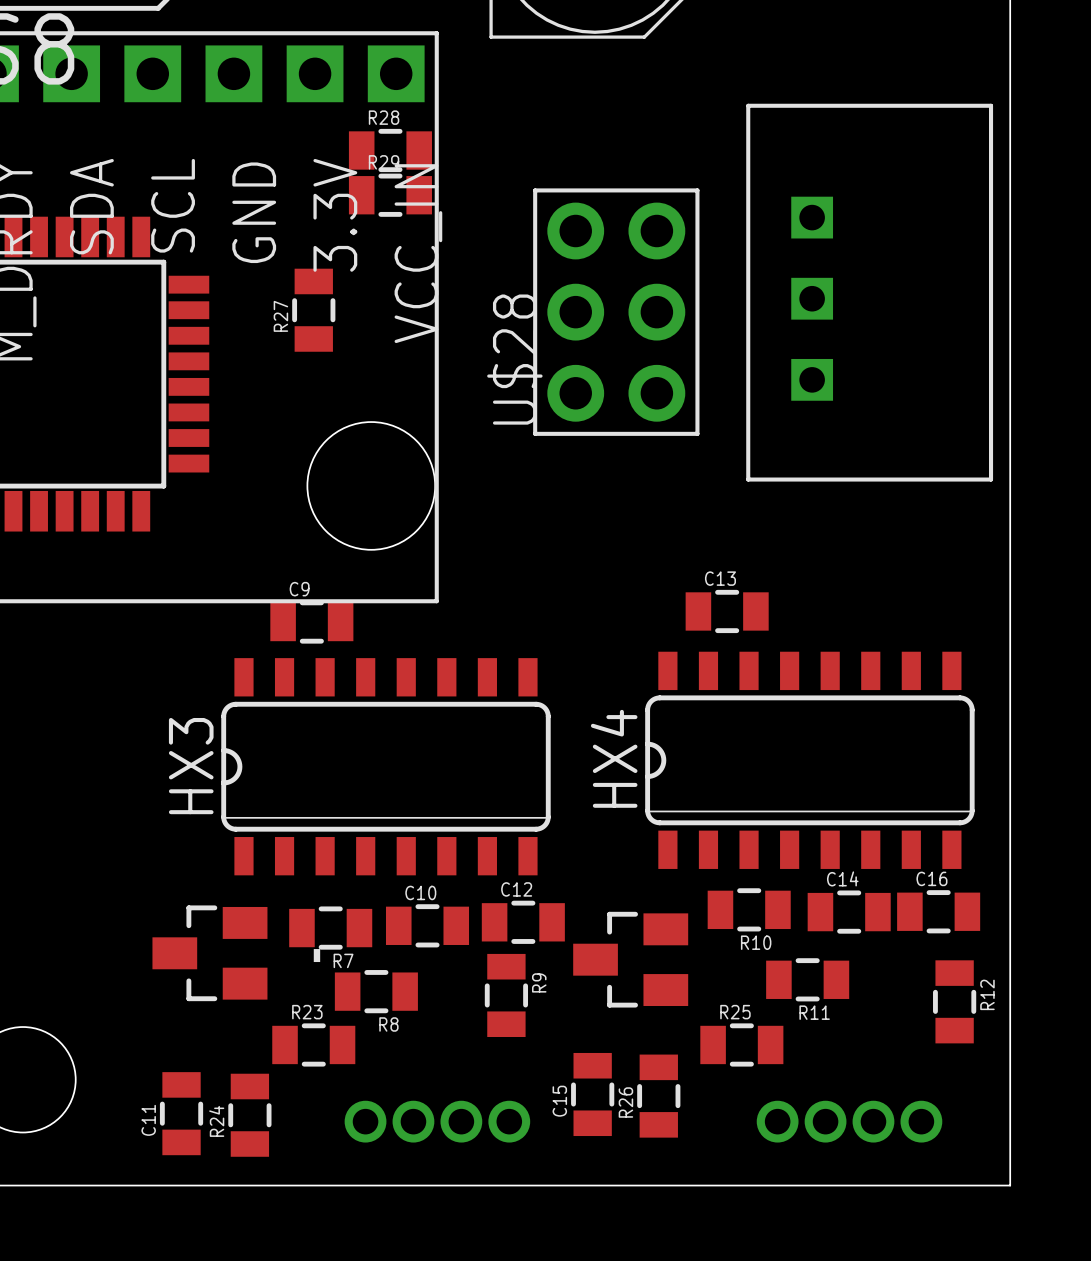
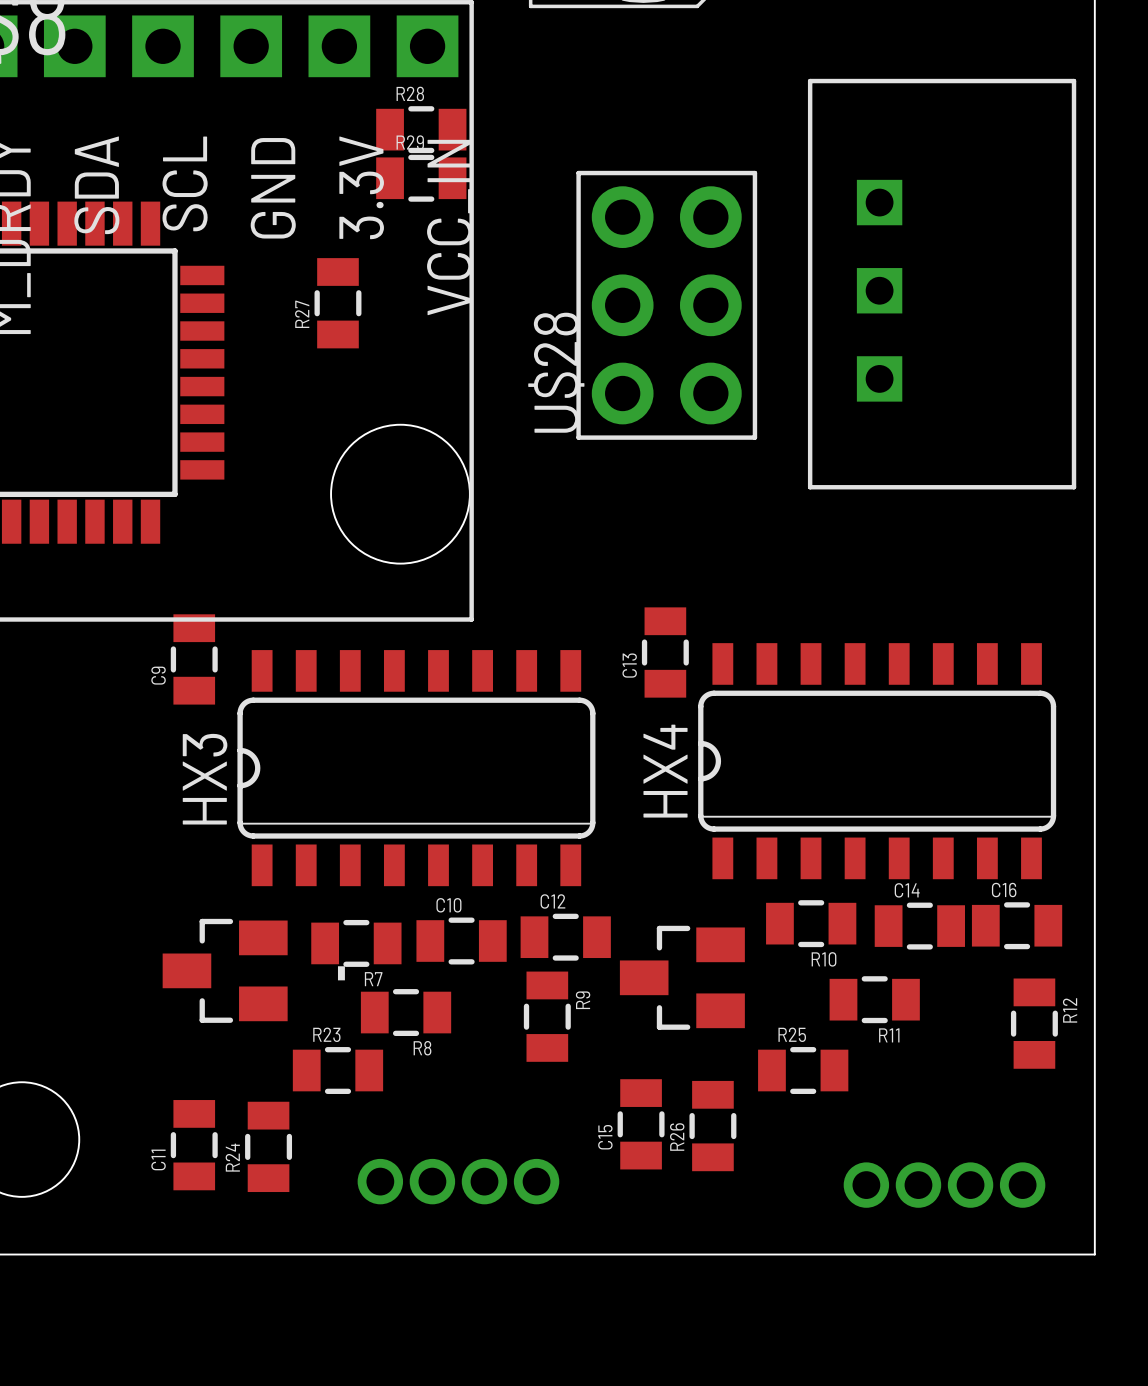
C13 rotation: 0° (727, 611) -> 90° clockwise (665, 652)
C13 position: (727, 611) -> (665, 652)
C9 rotation: 0° (311, 622) -> 90° clockwise (194, 659)
C9 position: (311, 622) -> (194, 659)
HX4 position: (809, 760) -> (877, 761)
HX3 position: (385, 766) -> (416, 768)
R10 position: (749, 909) -> (811, 923)
C16 position: (938, 911) -> (1017, 925)
C14 position: (849, 912) -> (919, 926)
C12 position: (523, 922) -> (565, 937)
C10 position: (427, 925) -> (461, 941)
R7 position: (330, 928) -> (356, 943)
part position: (209, 953) -> (225, 970)
line: (313, 955) (320, 955) -> (337, 973) (344, 973)
part position: (630, 959) -> (682, 977)
R11 position: (807, 979) -> (874, 999)
R8 position: (376, 991) -> (406, 1012)
R9 position: (506, 995) -> (547, 1016)
R12 position: (954, 1001) -> (1034, 1023)
R23 position: (313, 1044) -> (337, 1070)
R25 position: (741, 1044) -> (803, 1070)
C15 position: (592, 1094) -> (641, 1124)
R26 position: (658, 1096) -> (712, 1126)
C11 position: (181, 1113) -> (194, 1145)
R24 position: (249, 1115) -> (268, 1146)
part position: (437, 1121) -> (458, 1181)
part position: (849, 1121) -> (944, 1185)

